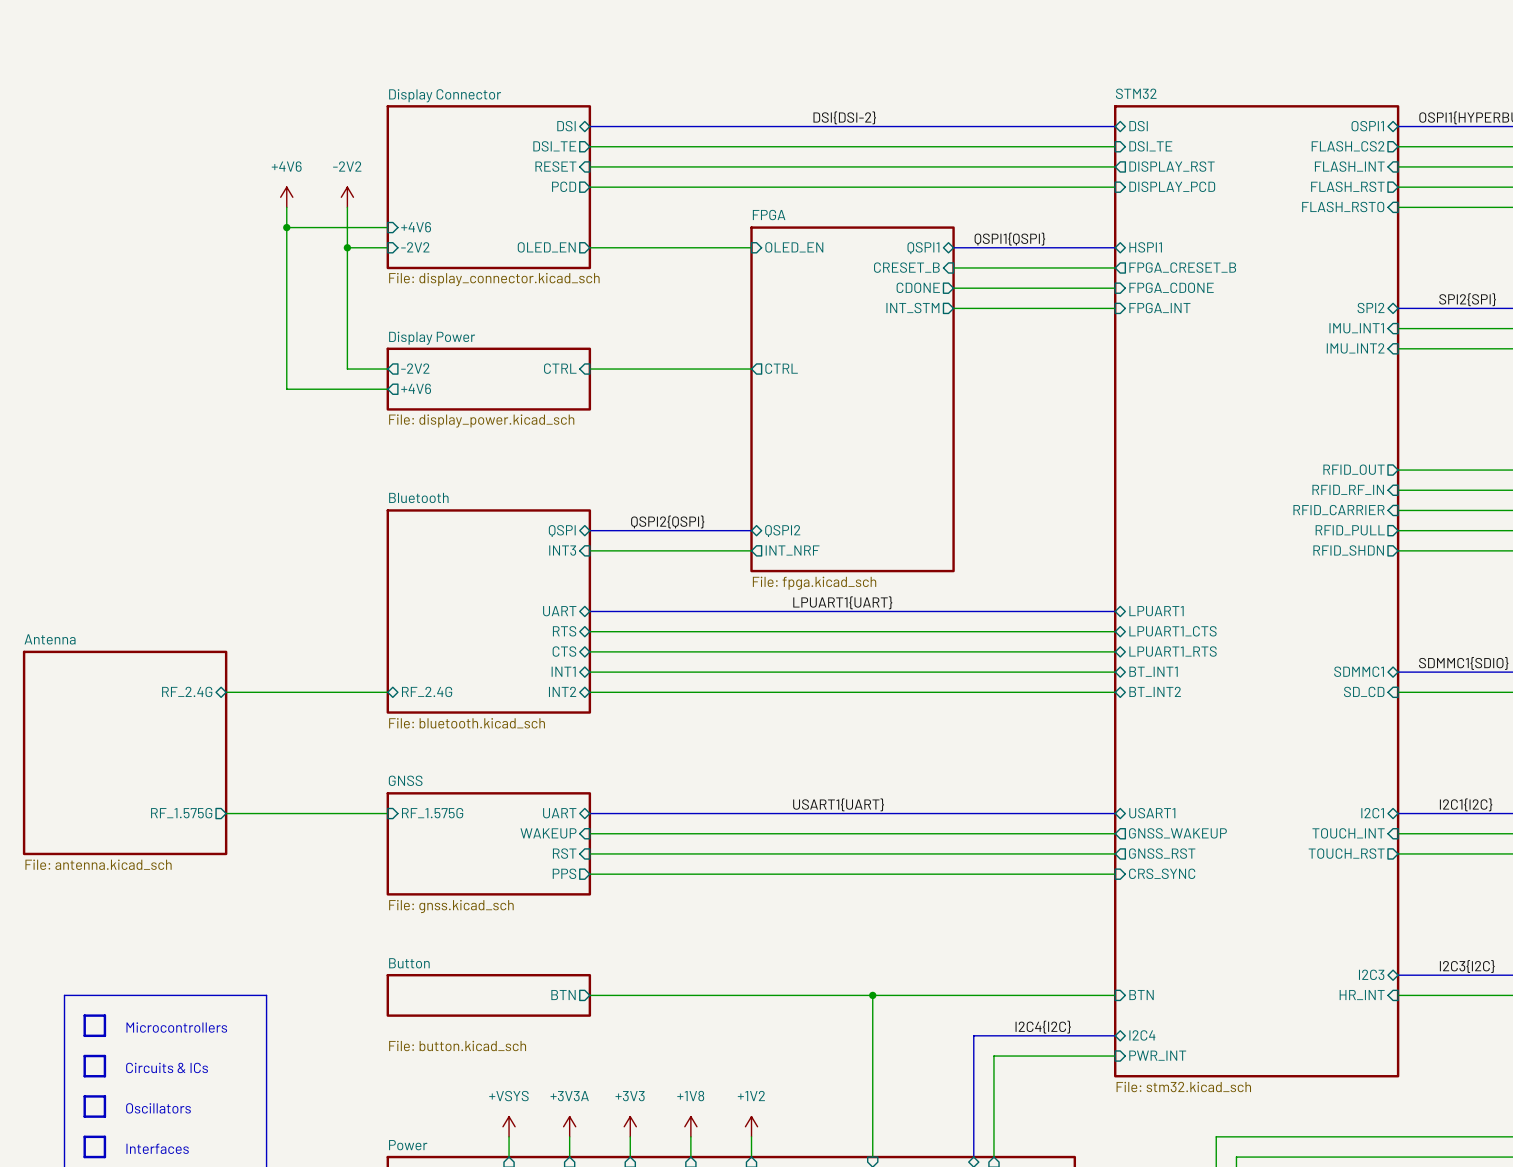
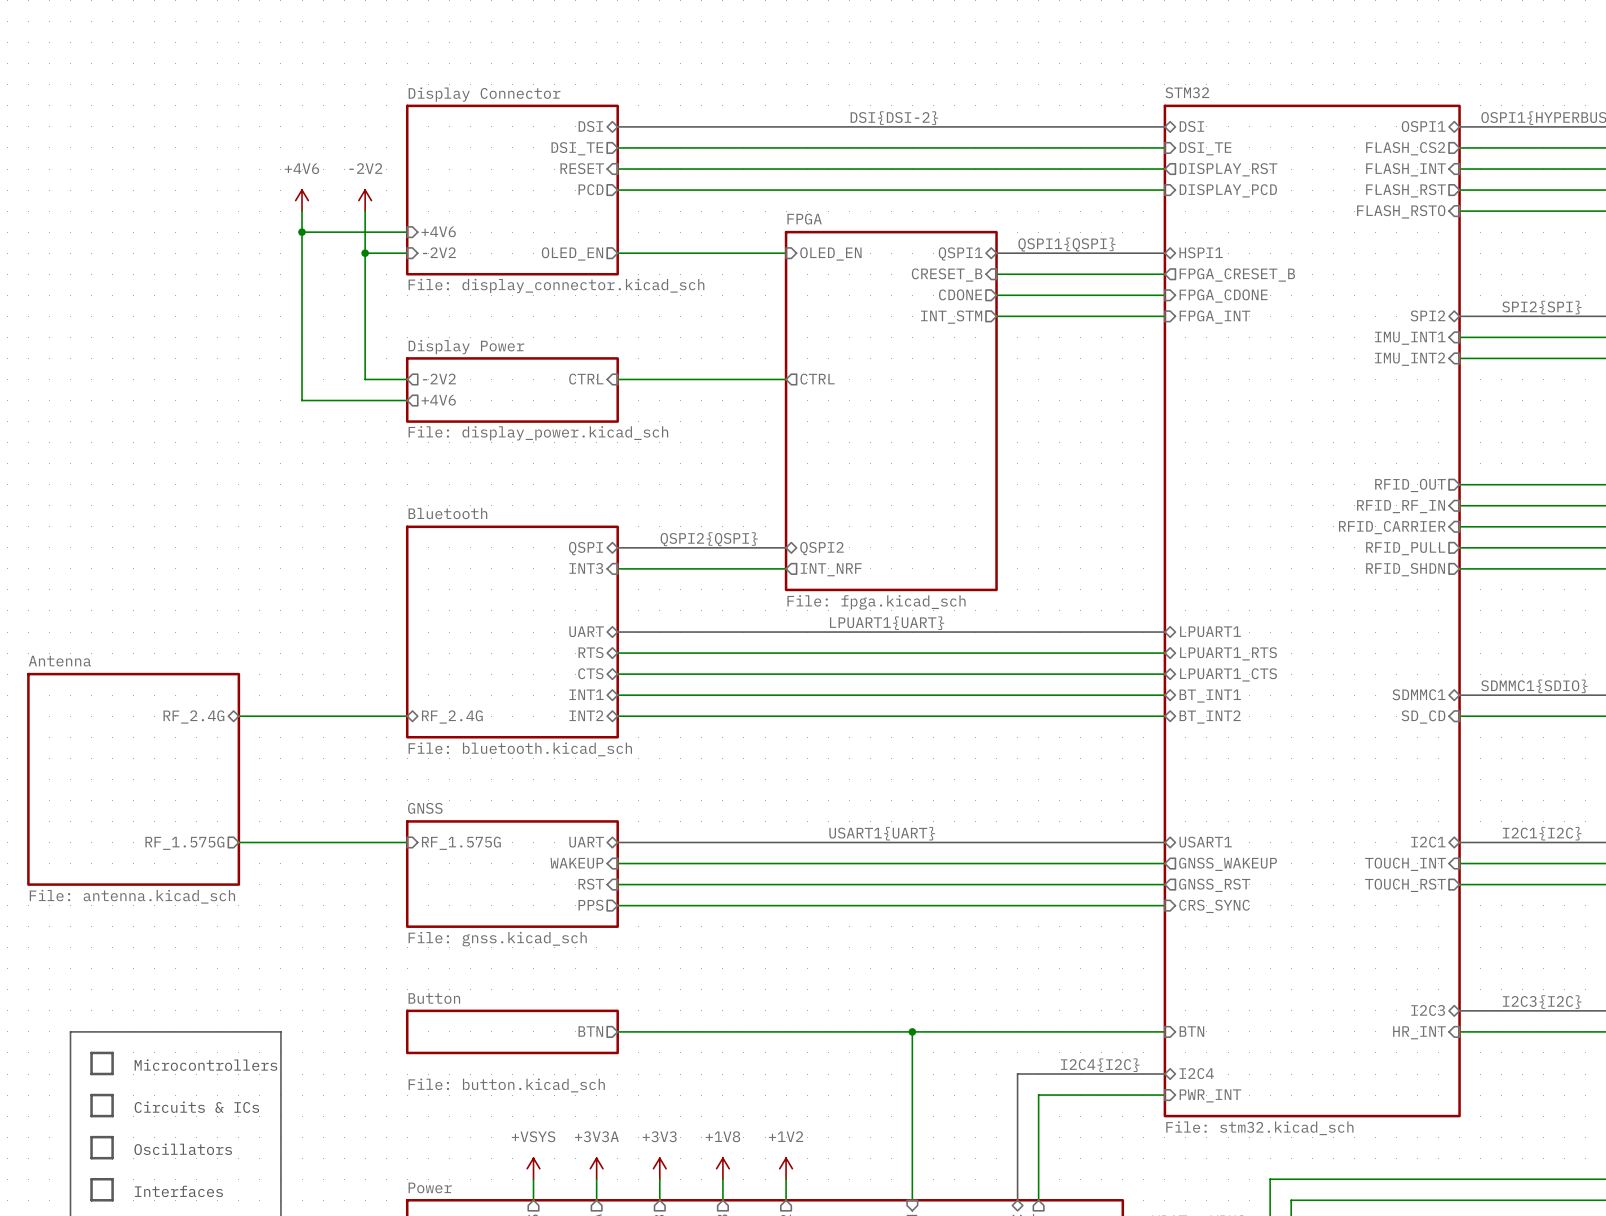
sheet pin: LPUART1_CTS (1173, 631) -> LPUART1_RTS (1228, 653)
sheet pin: LPUART1_RTS (1173, 651) -> LPUART1_CTS (1228, 674)

